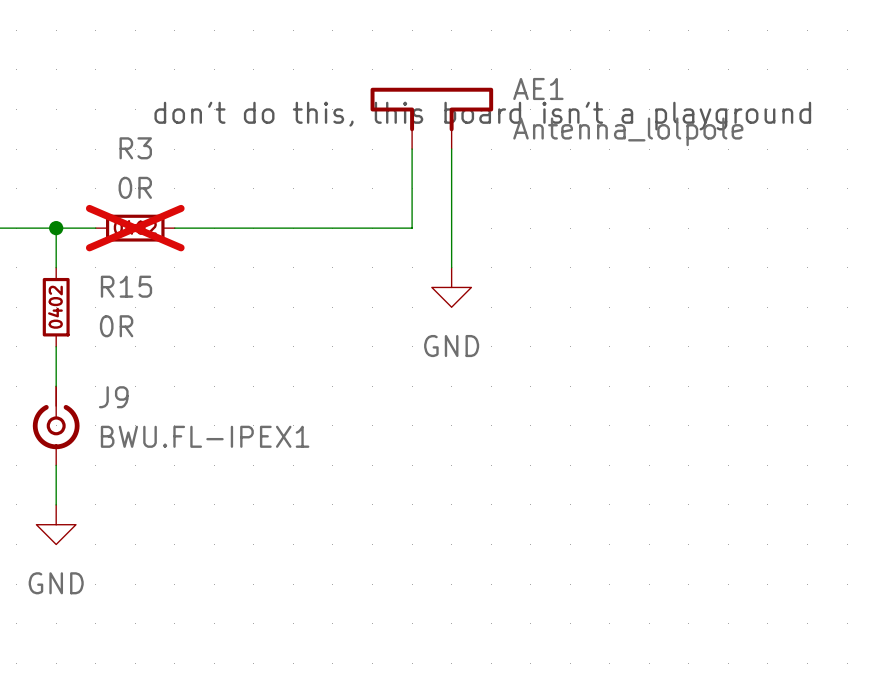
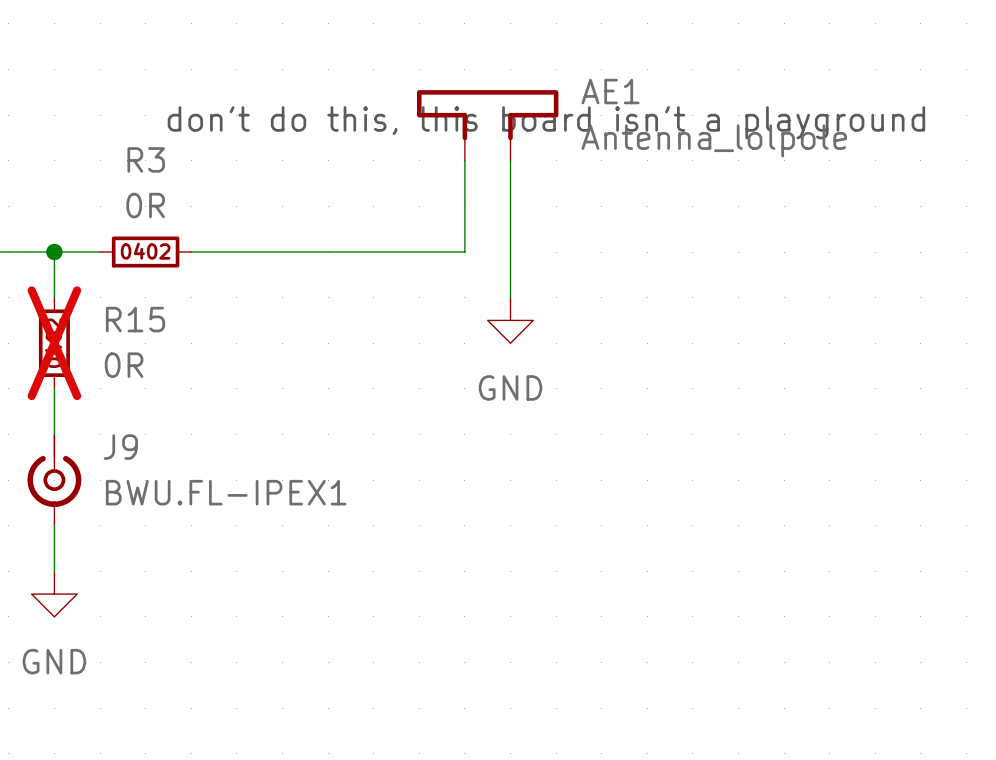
R3 do-not-place cross: (135, 228) -> none
R15 do-not-place cross: none -> (54, 343)

